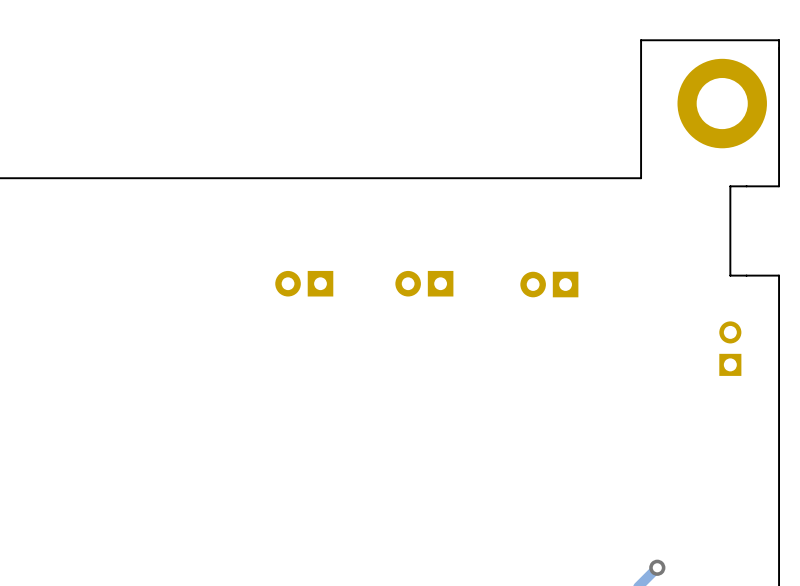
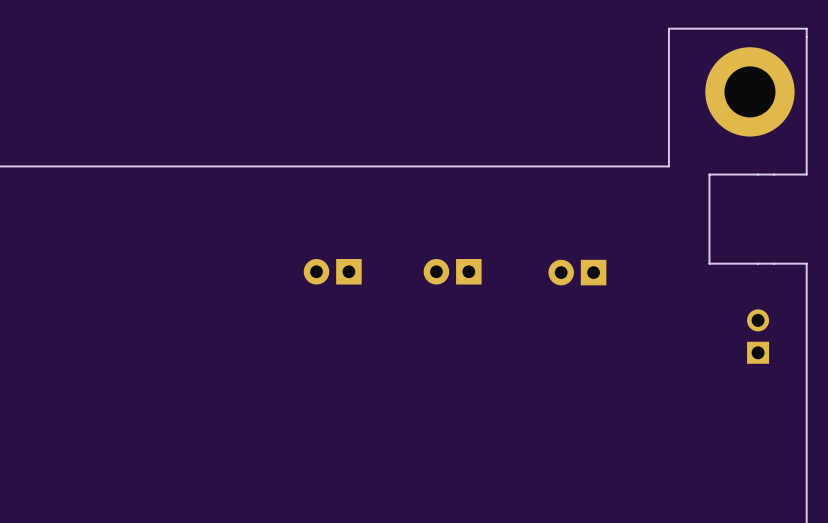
board edge: (730, 186) (730, 275) -> (758, 174) (709, 174) (709, 263) (758, 263)

